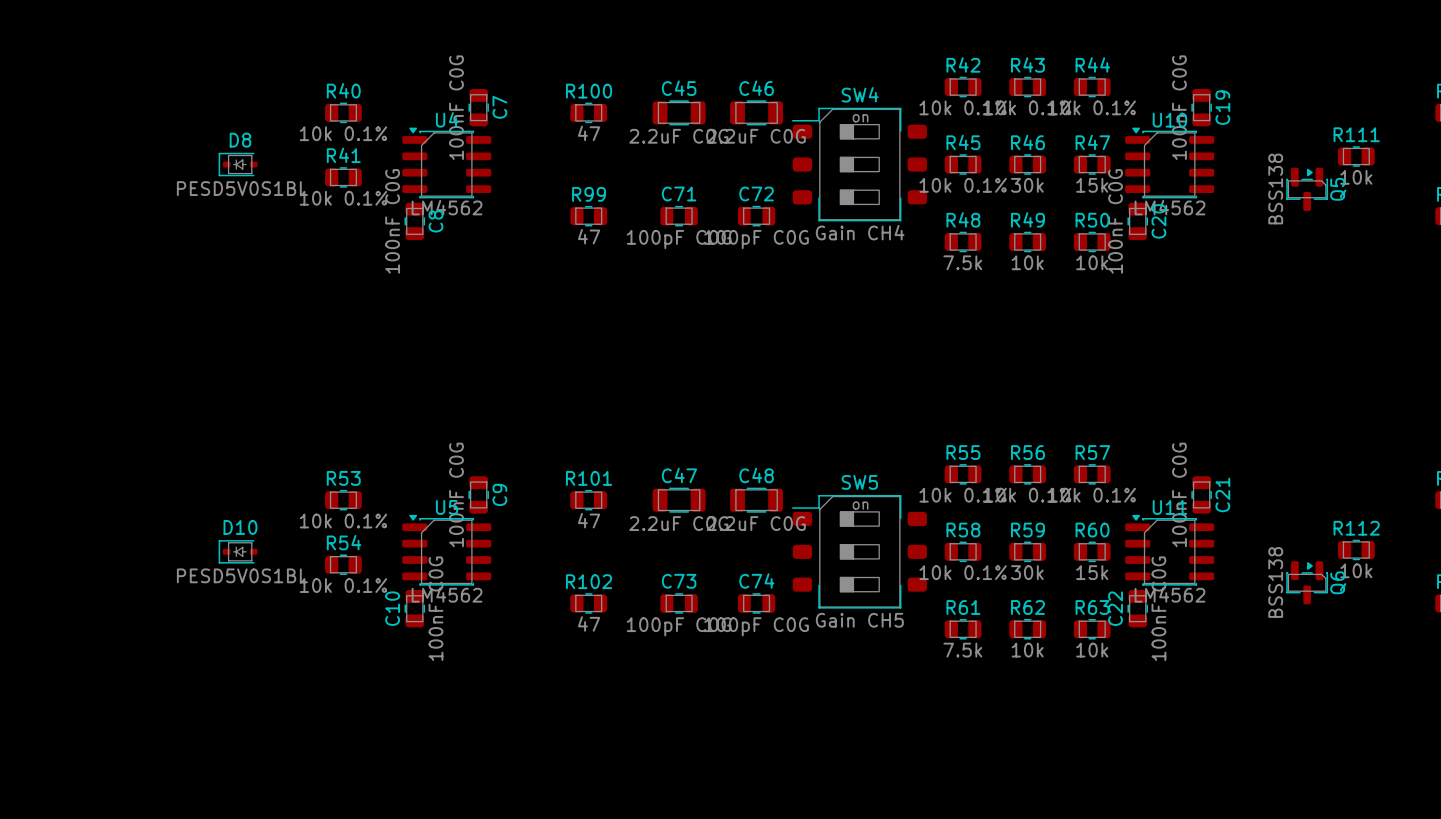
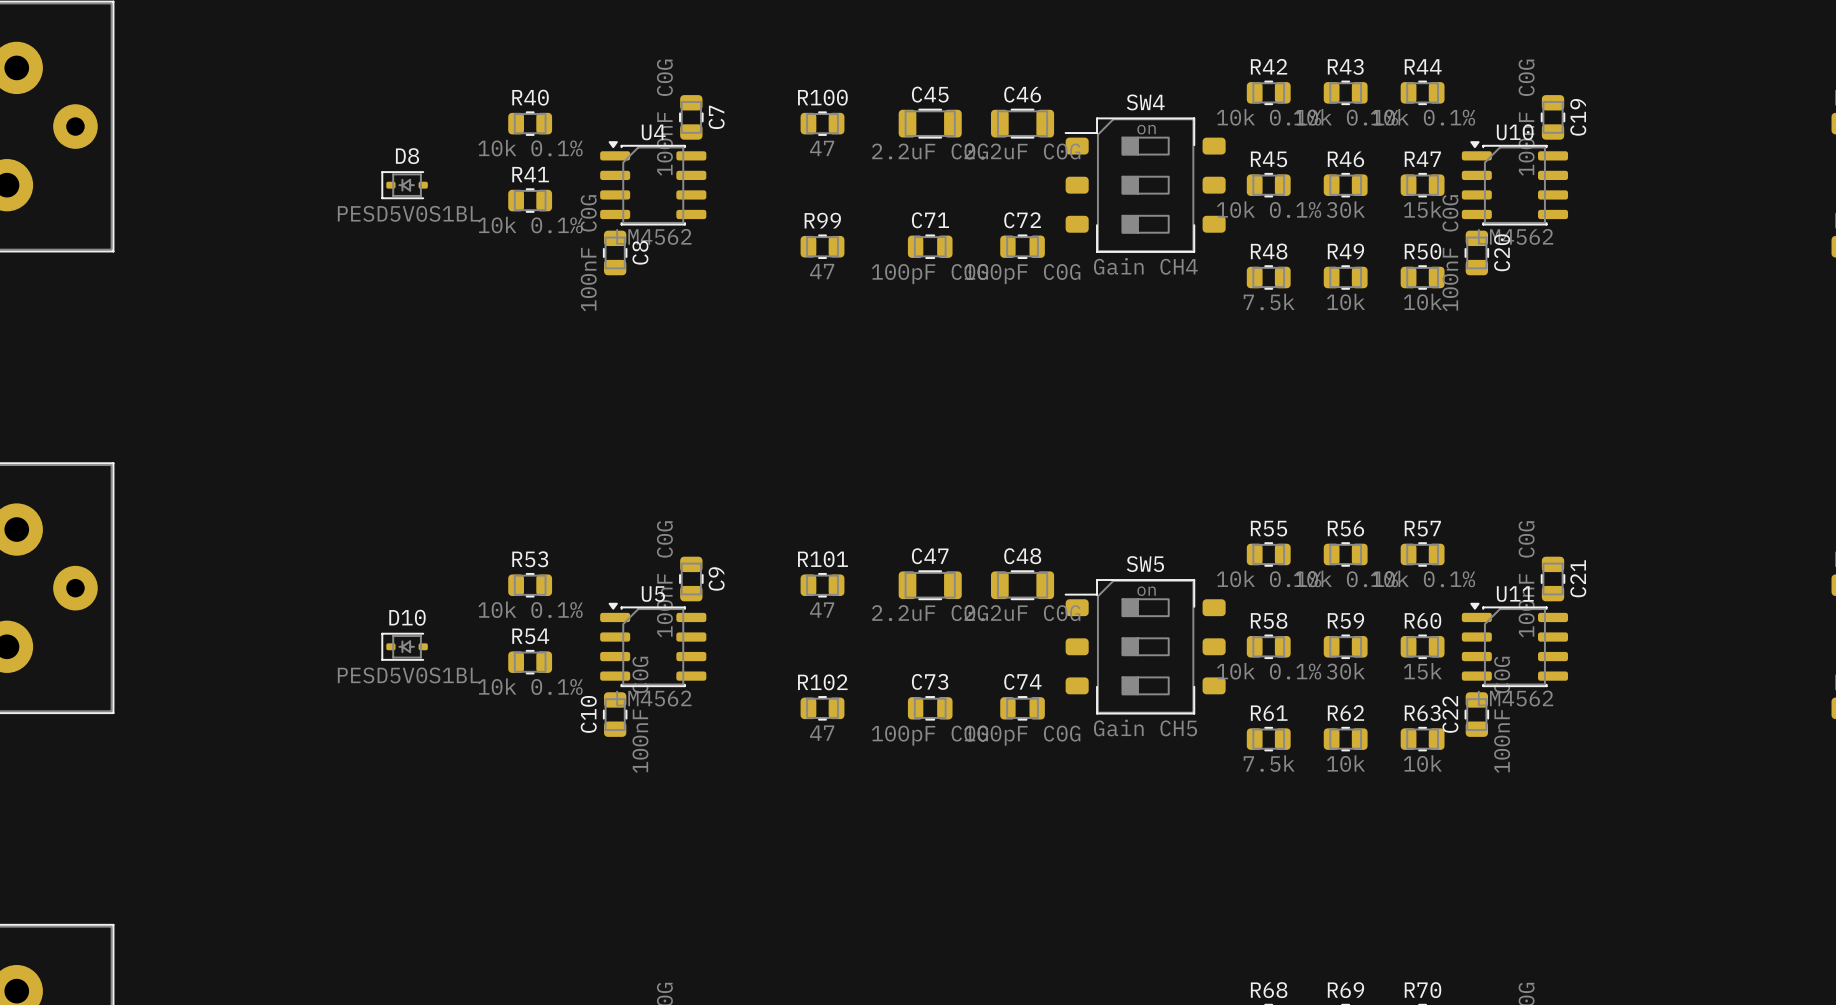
R111: 10k (1356, 156) -> none
Q5: BSS138 (1307, 189) -> none
R112: 10k (1356, 550) -> none
Q6: BSS138 (1307, 582) -> none

